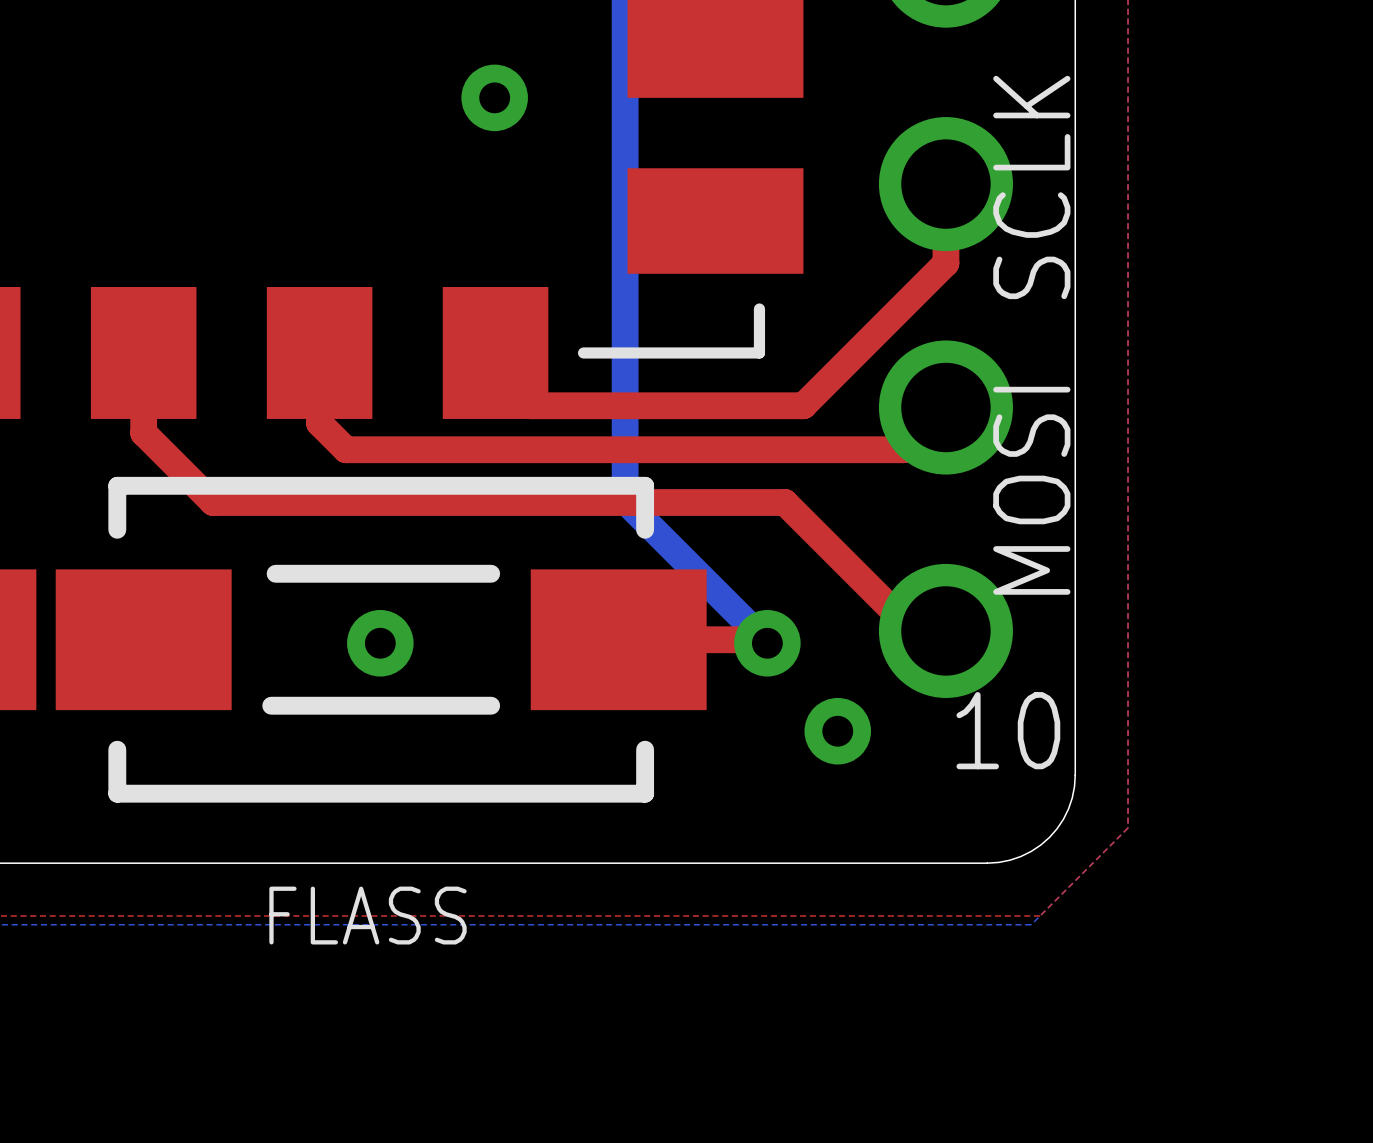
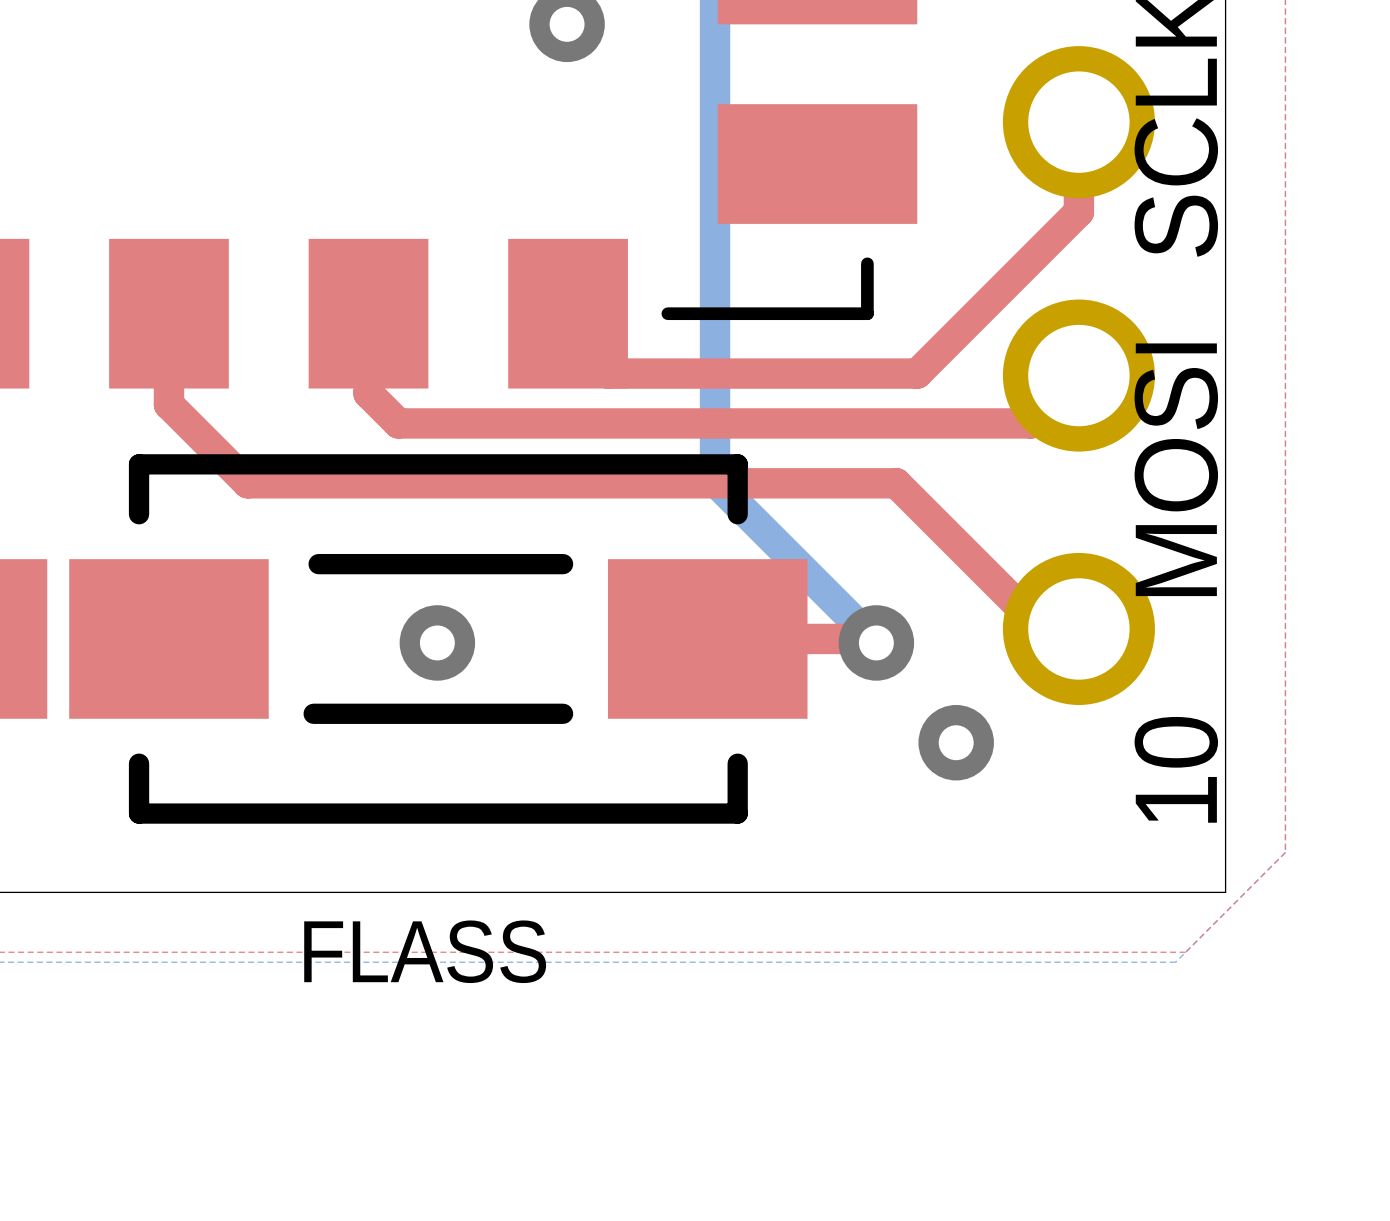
text rotation: 0° (1008, 730) -> 90° counterclockwise (1176, 769)
board edge: (1075, 775) (1068, 808) (1057, 828) (1049, 837) (1040, 845) (1020, 856) (987, 863) -> (1225, 792) (1225, 892) (1125, 892)

